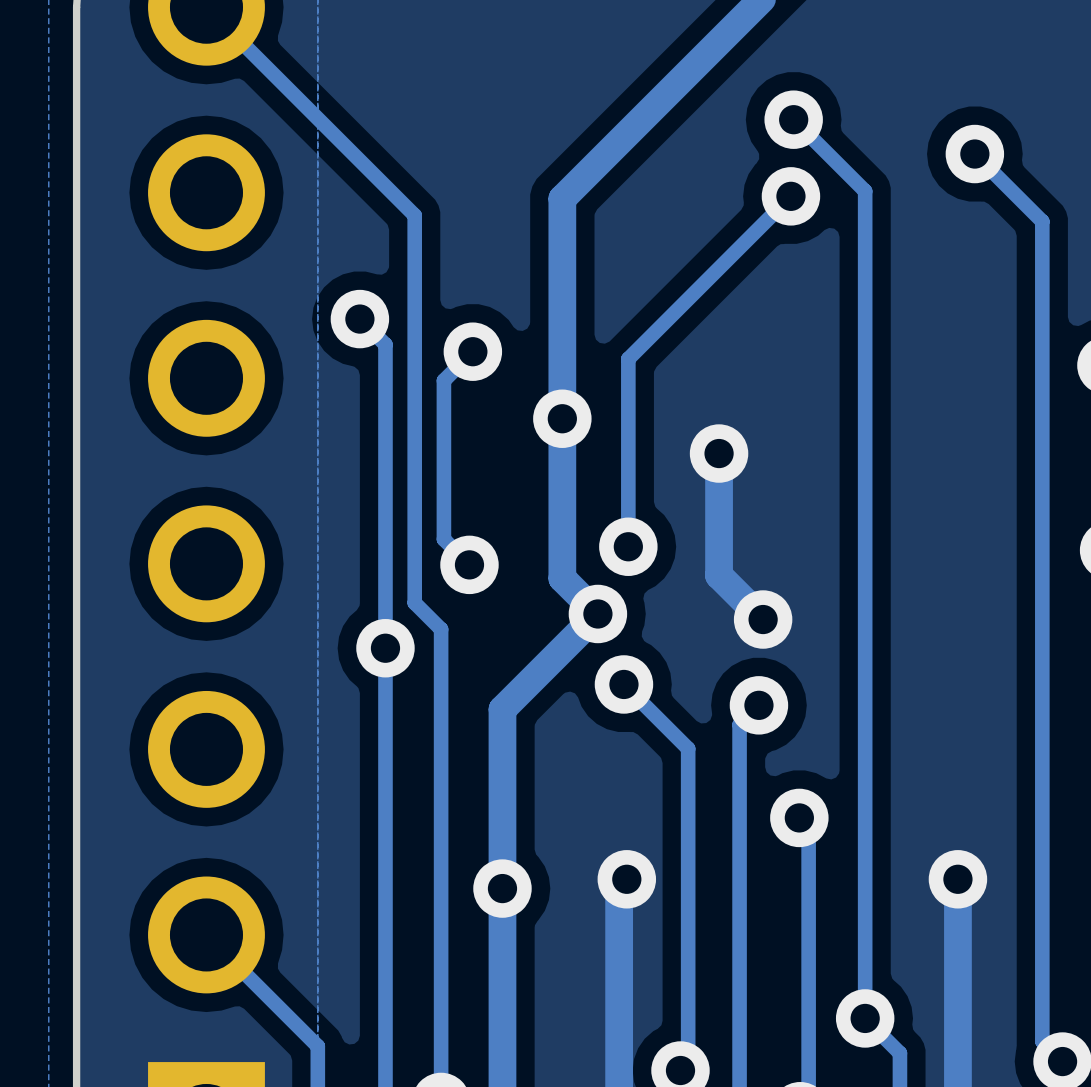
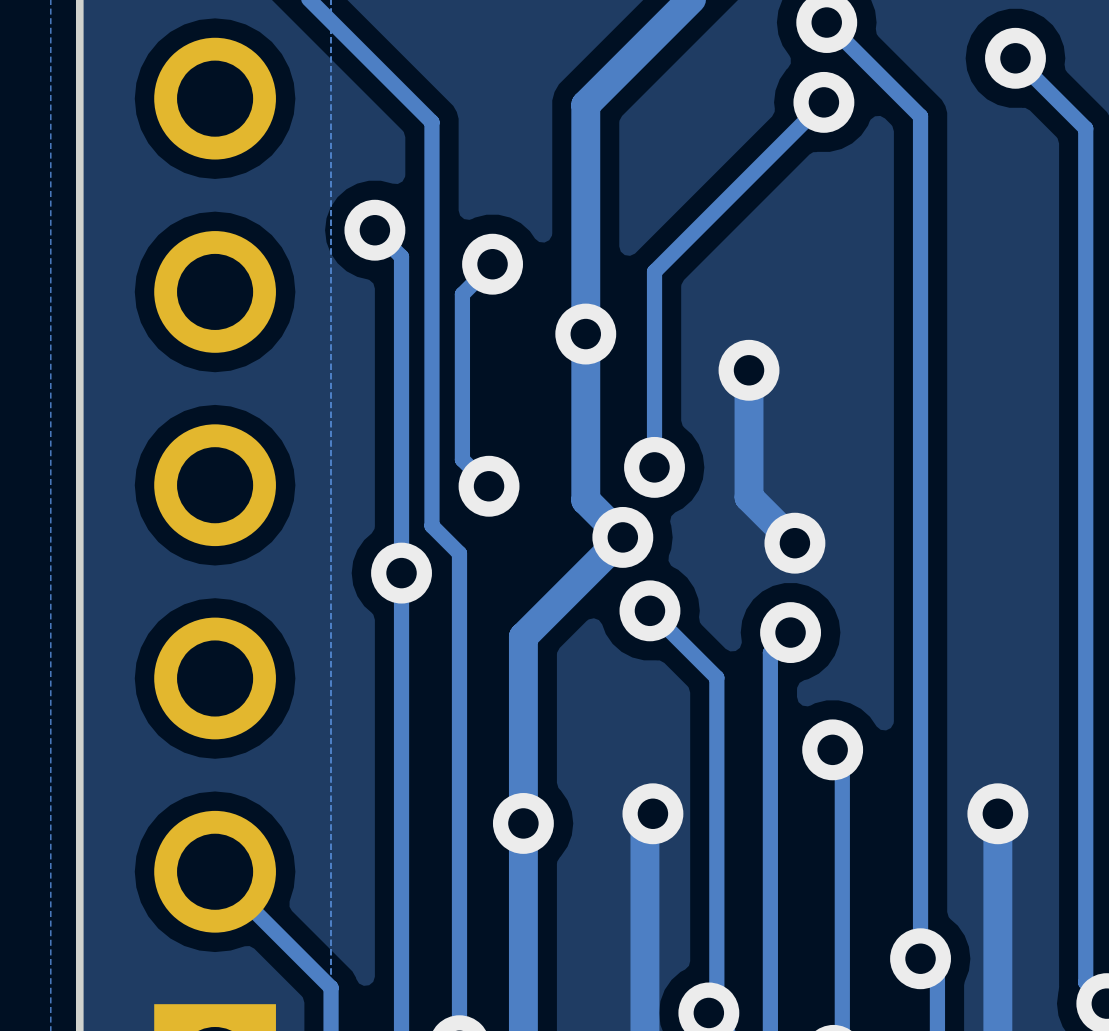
track: (865, 191) (865, 1018) (899, 1053) -> (901, 97) (920, 116) (920, 958) (937, 975) (937, 994)
via position: (865, 1018) -> (920, 958)

